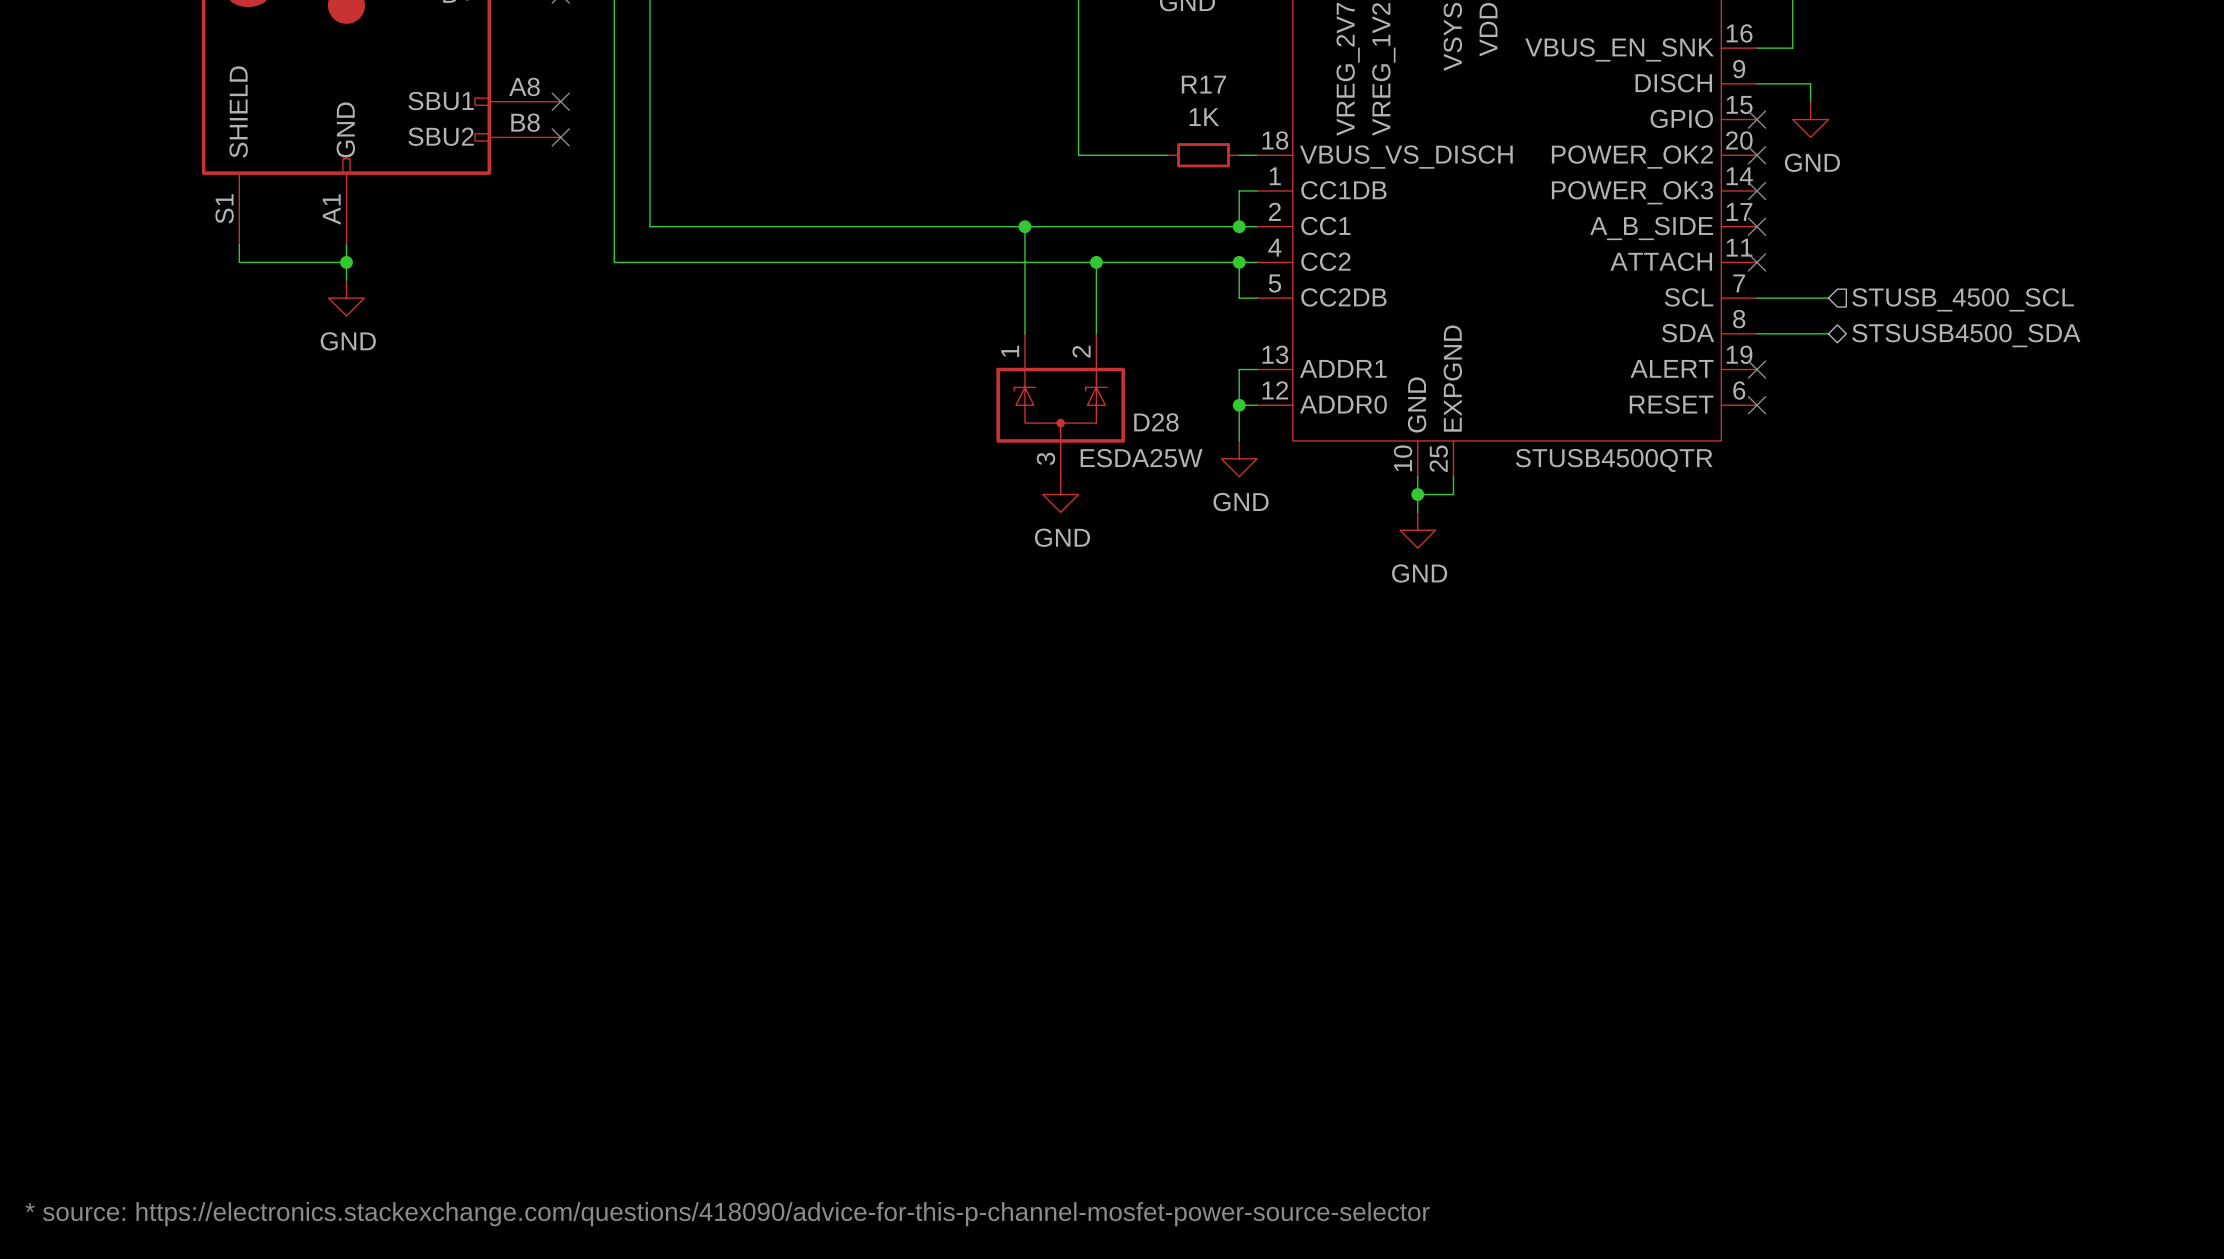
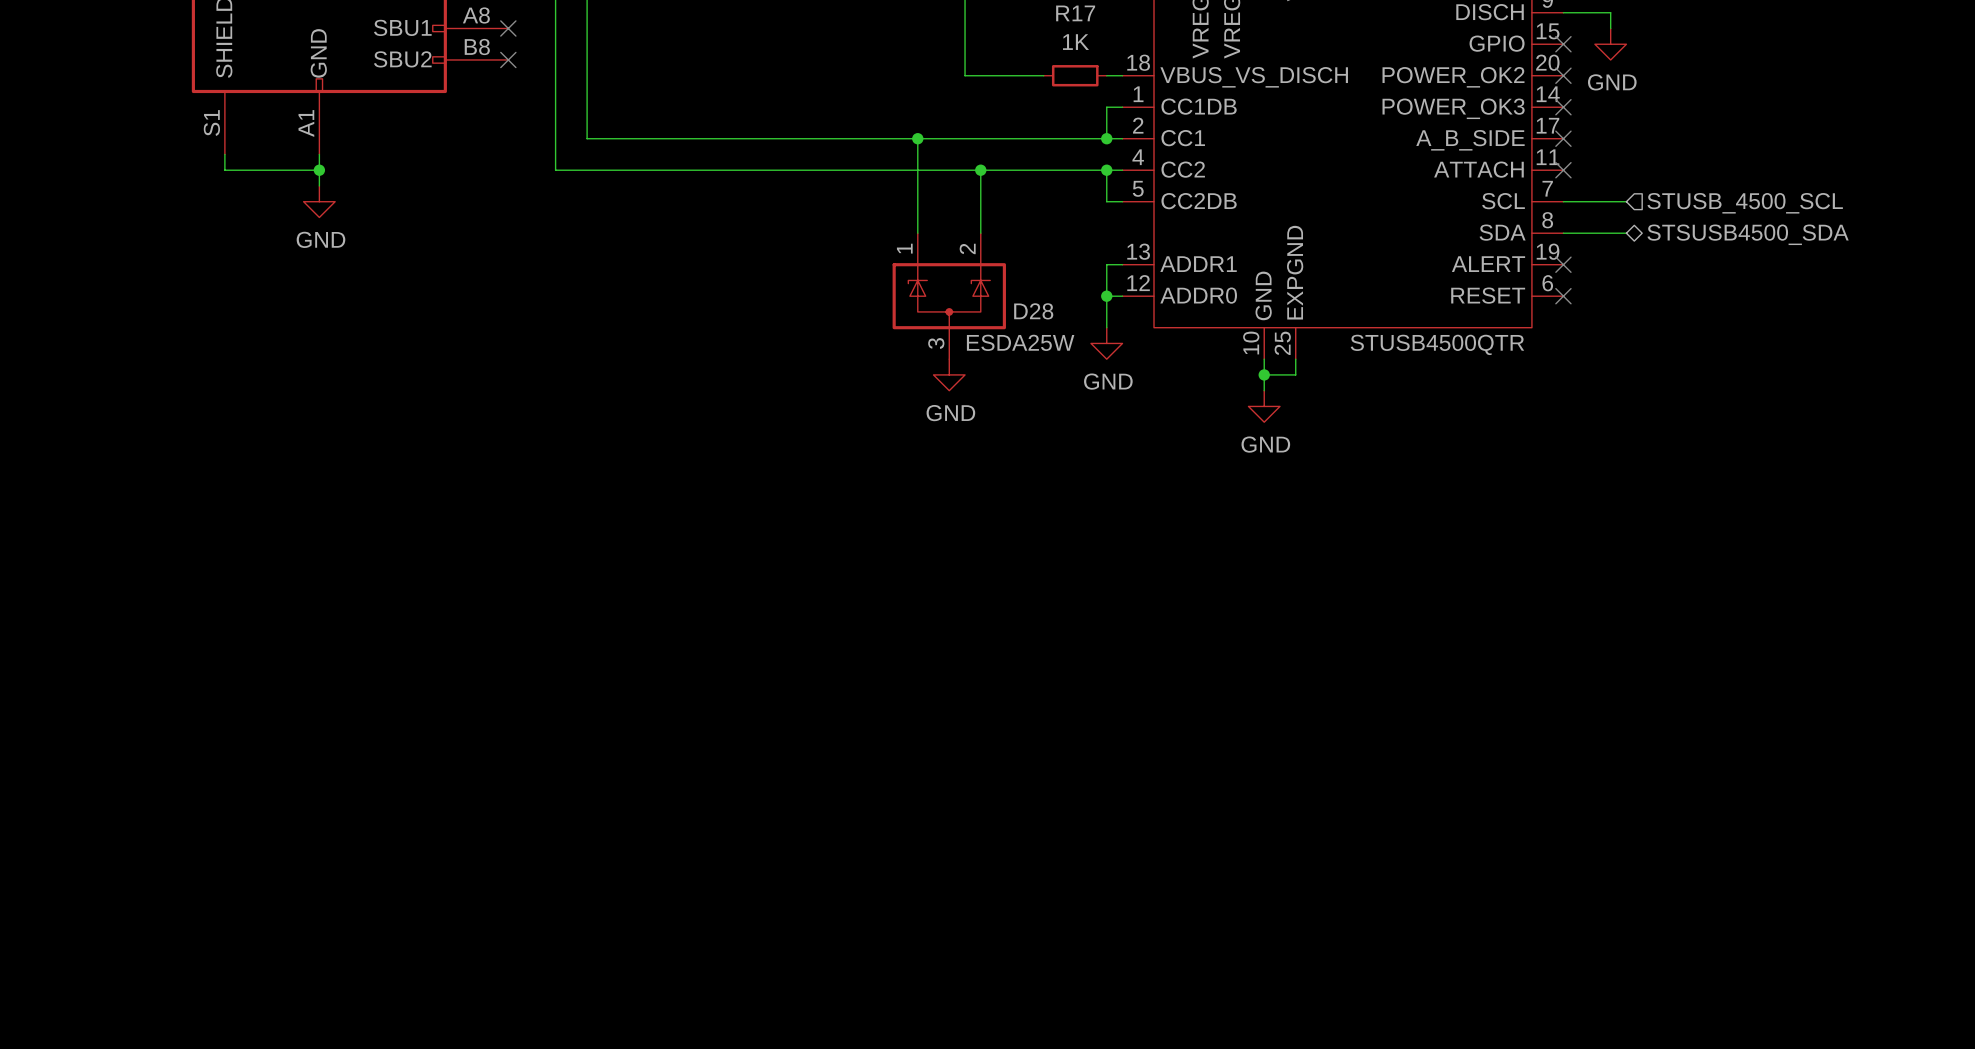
text: * source: https://electronics.stackexchange.com/questions/418090/advice-for-this-p-channel-mosfet-power-source-selector (727, 1214) -> none

